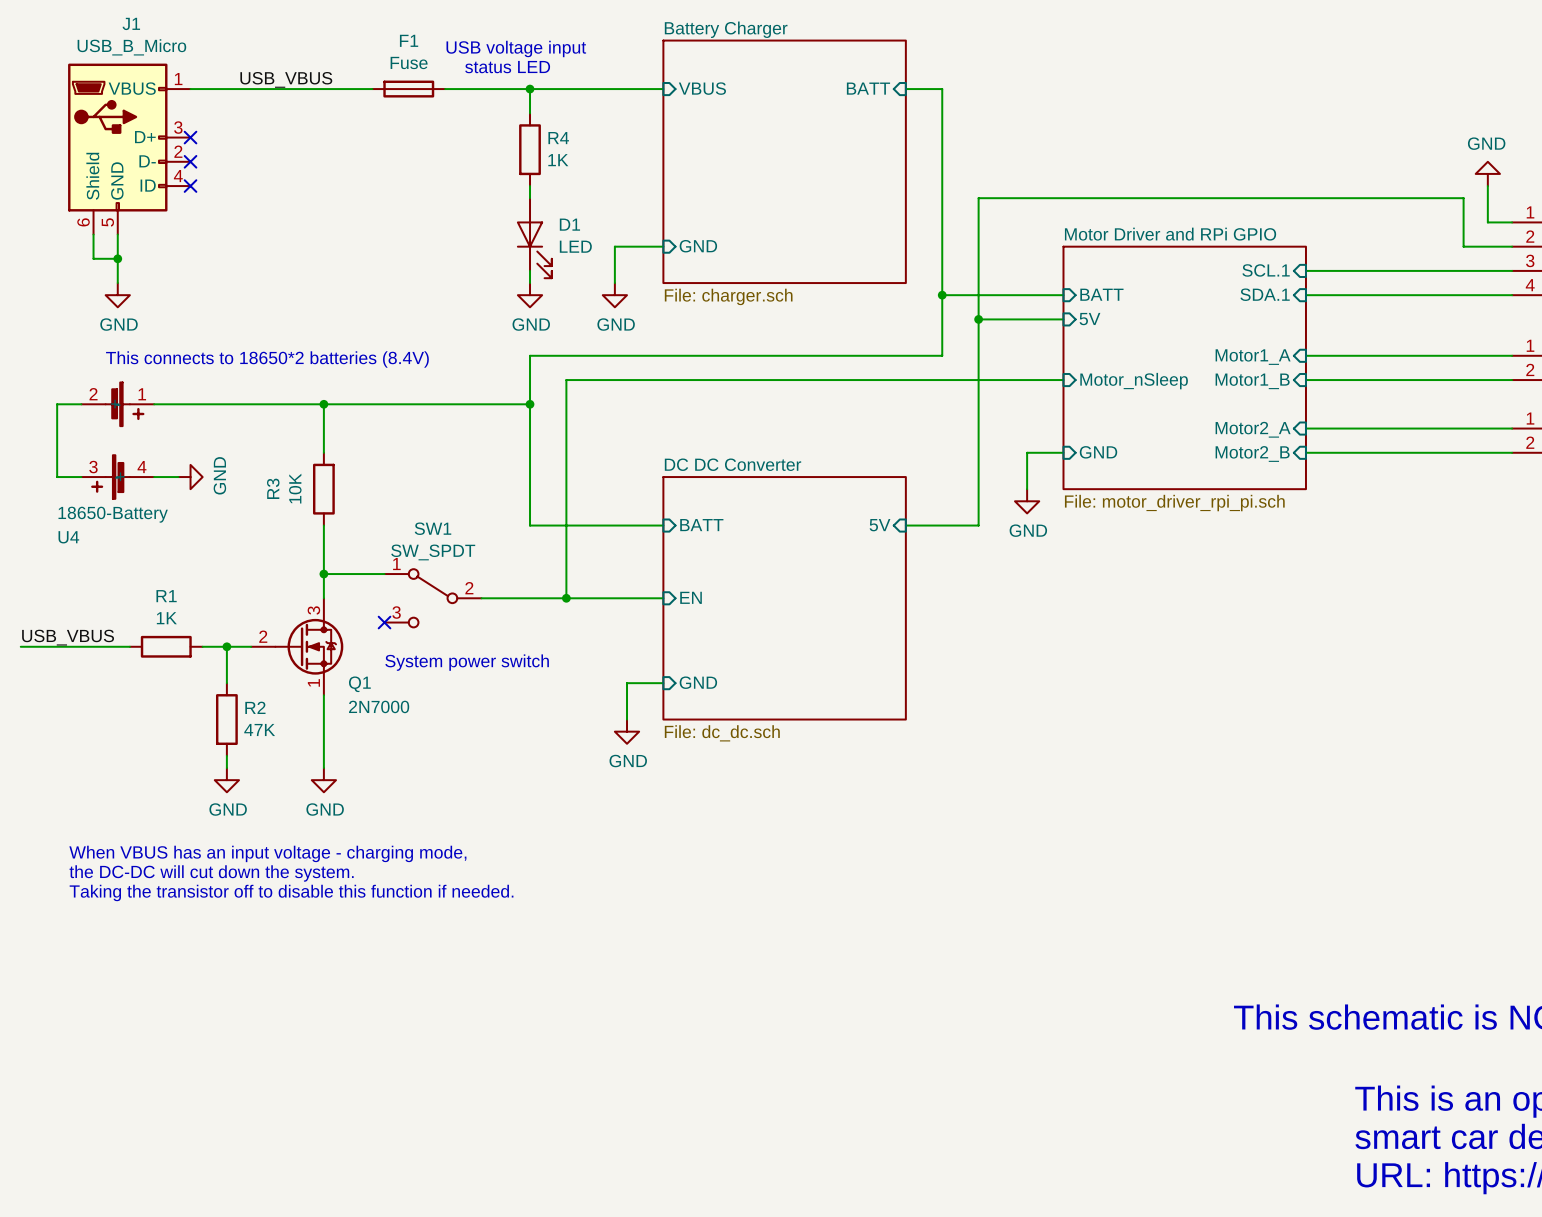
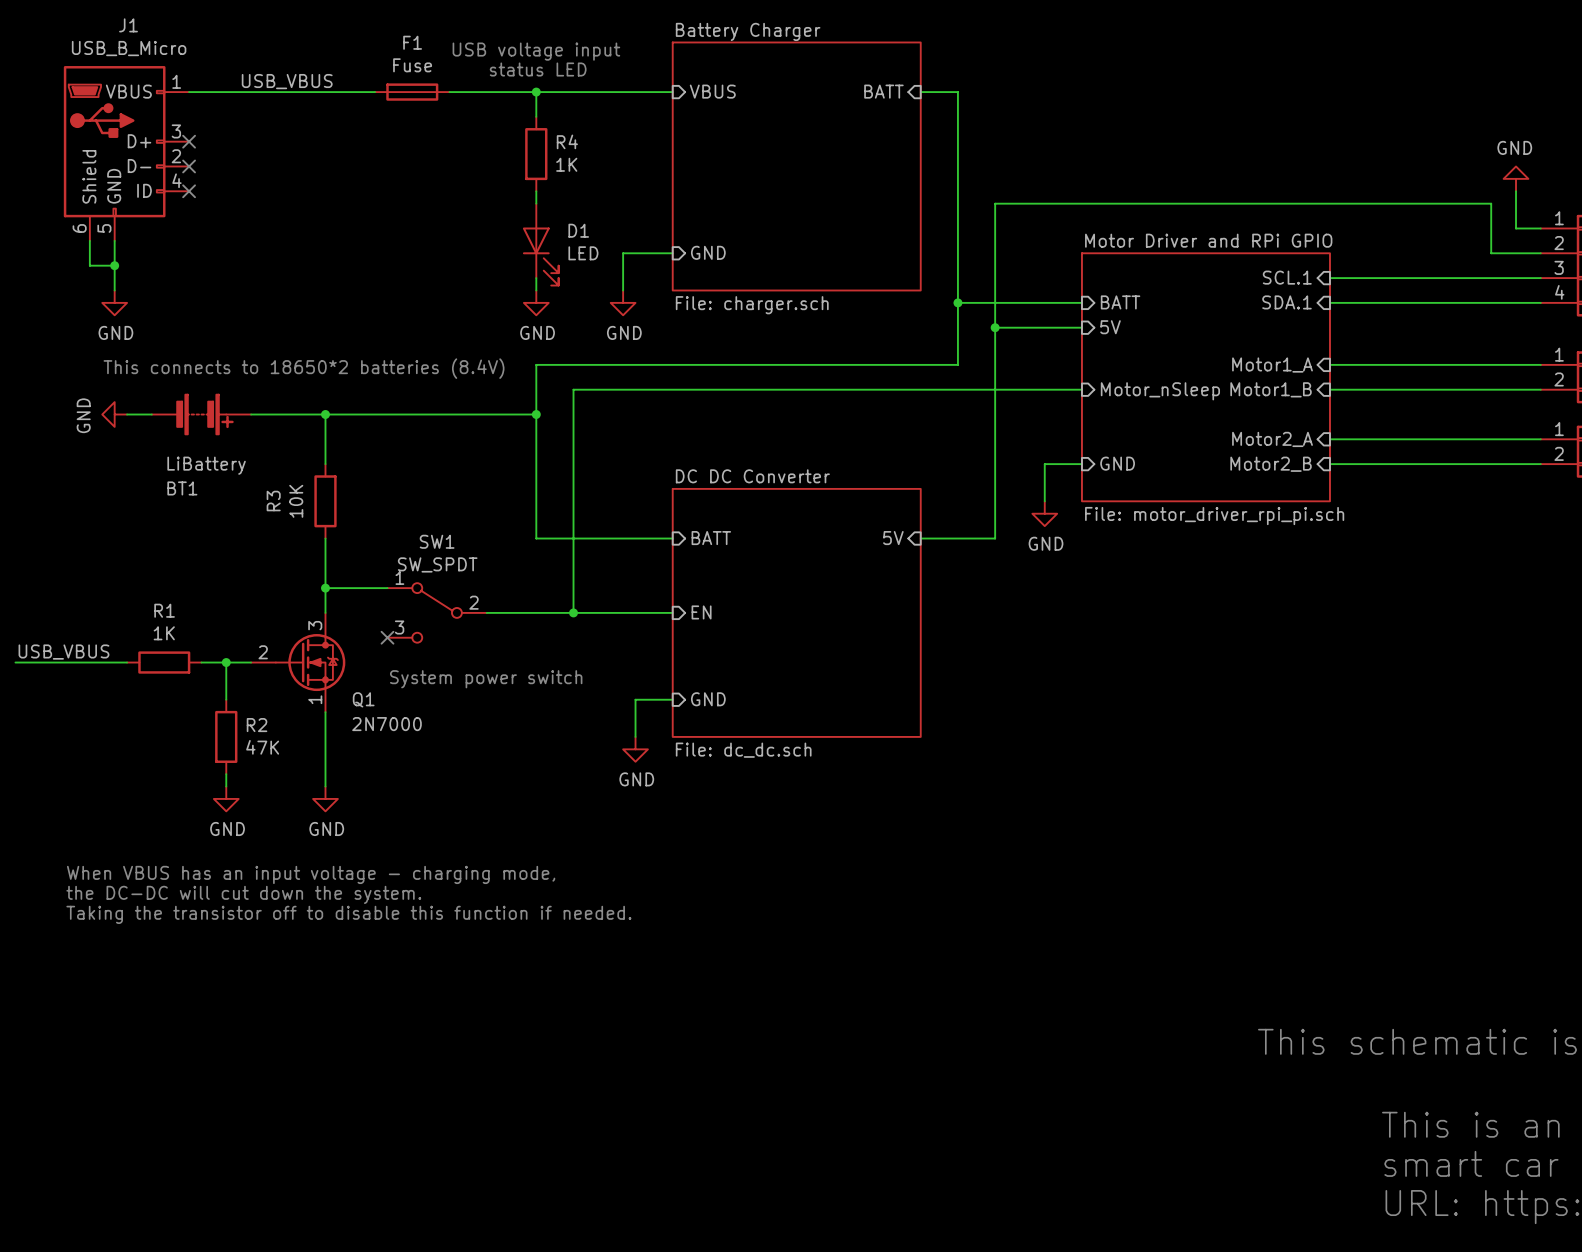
wire: (81, 404) (57, 404) (57, 477) (81, 477) -> none
BT1: none -> LiBattery (201, 414)
U4: 18650-Battery (117, 440) -> none
wire: (154, 477) (178, 477) -> none
power symbol rotation: 0° (190, 477) -> 180° (114, 414)
power symbol position: GND (190, 477) -> GND (114, 414)

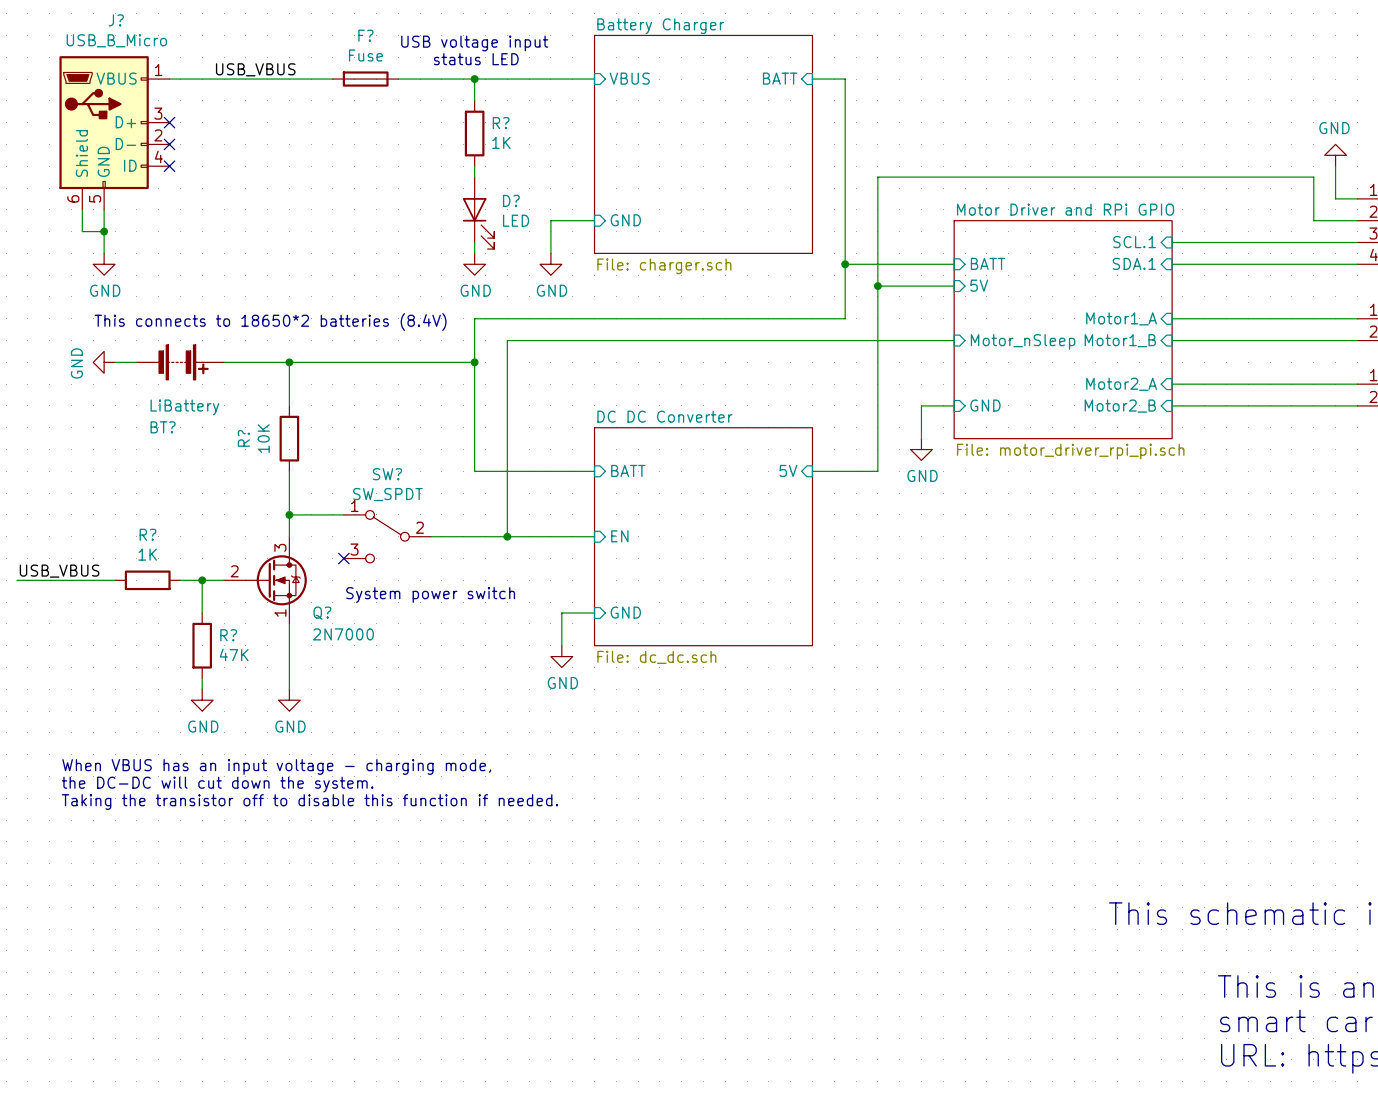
J1 name: J1 (128, 25) -> J? (116, 20)
F1 name: F1 (412, 42) -> F? (365, 35)
R4 name: R4 (567, 141) -> R? (501, 123)
D1 name: D1 (578, 230) -> D? (511, 200)
BT1 name: BT1 (182, 488) -> BT? (163, 427)
R3 name: R3 (273, 501) -> R? (243, 438)
SW1 name: SW1 (437, 541) -> SW? (387, 474)
R1 name: R1 (164, 610) -> R? (147, 534)
Q1 name: Q1 (363, 699) -> Q? (322, 613)
R2 name: R2 (257, 725) -> R? (228, 635)

